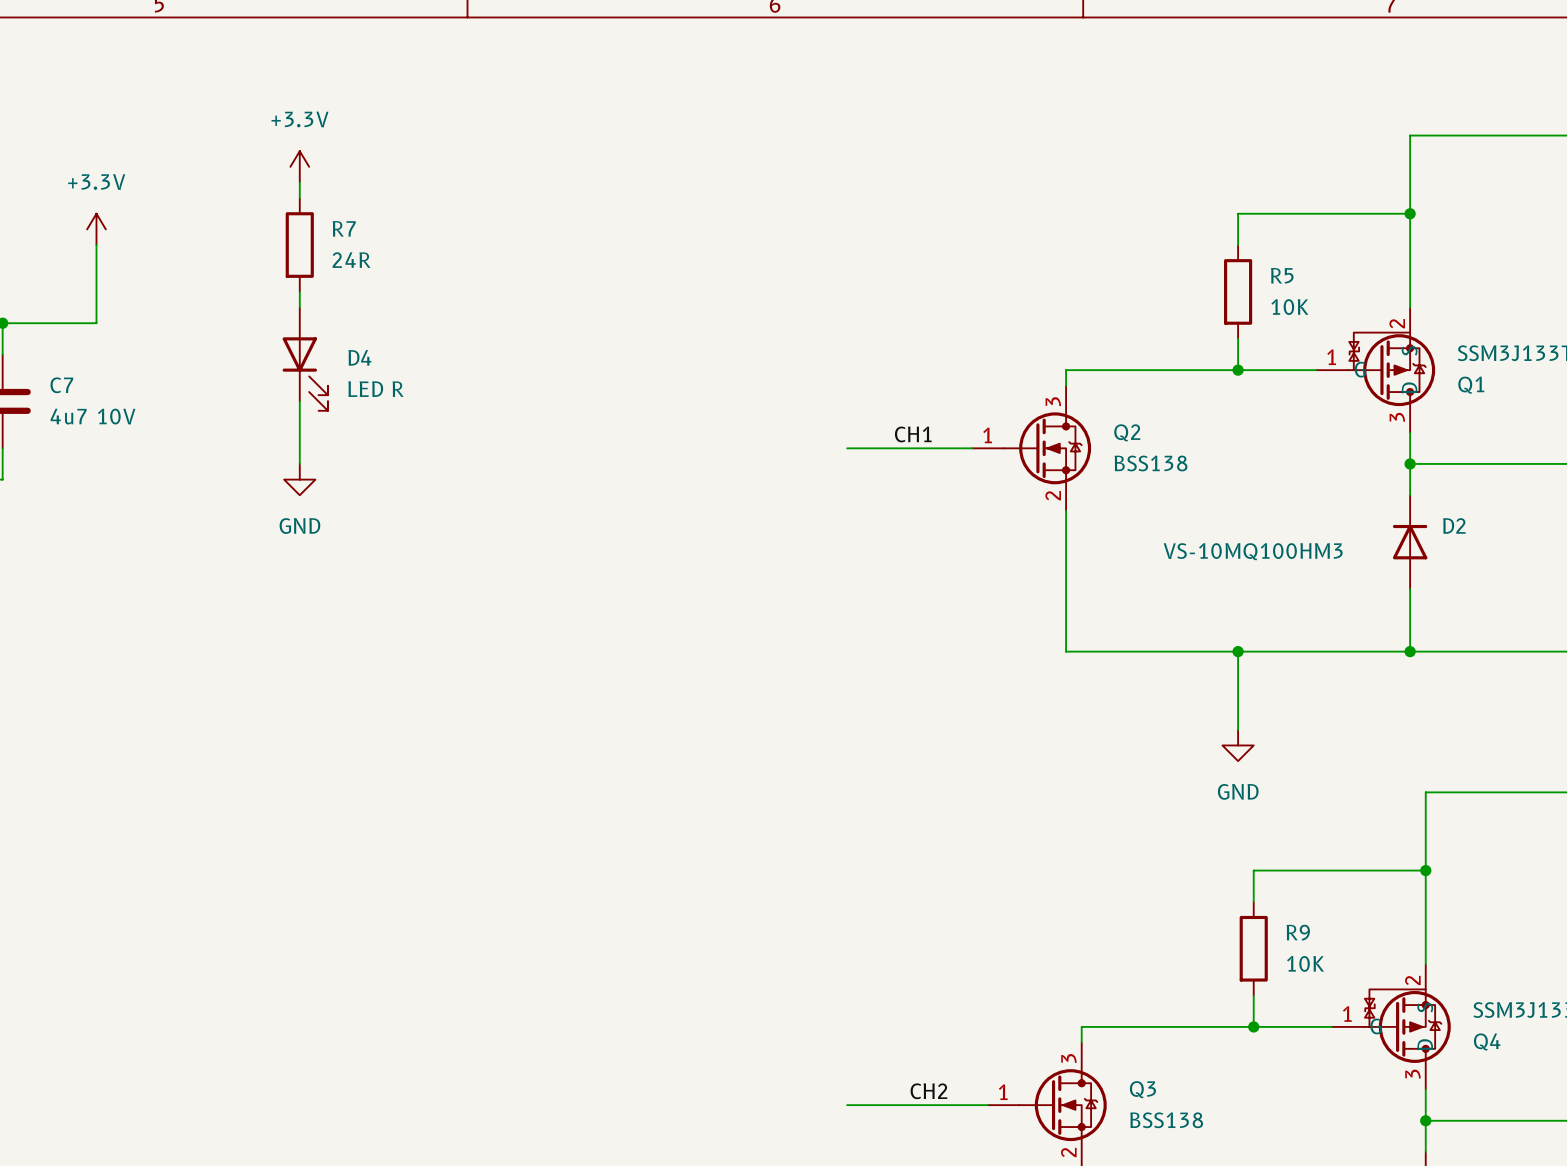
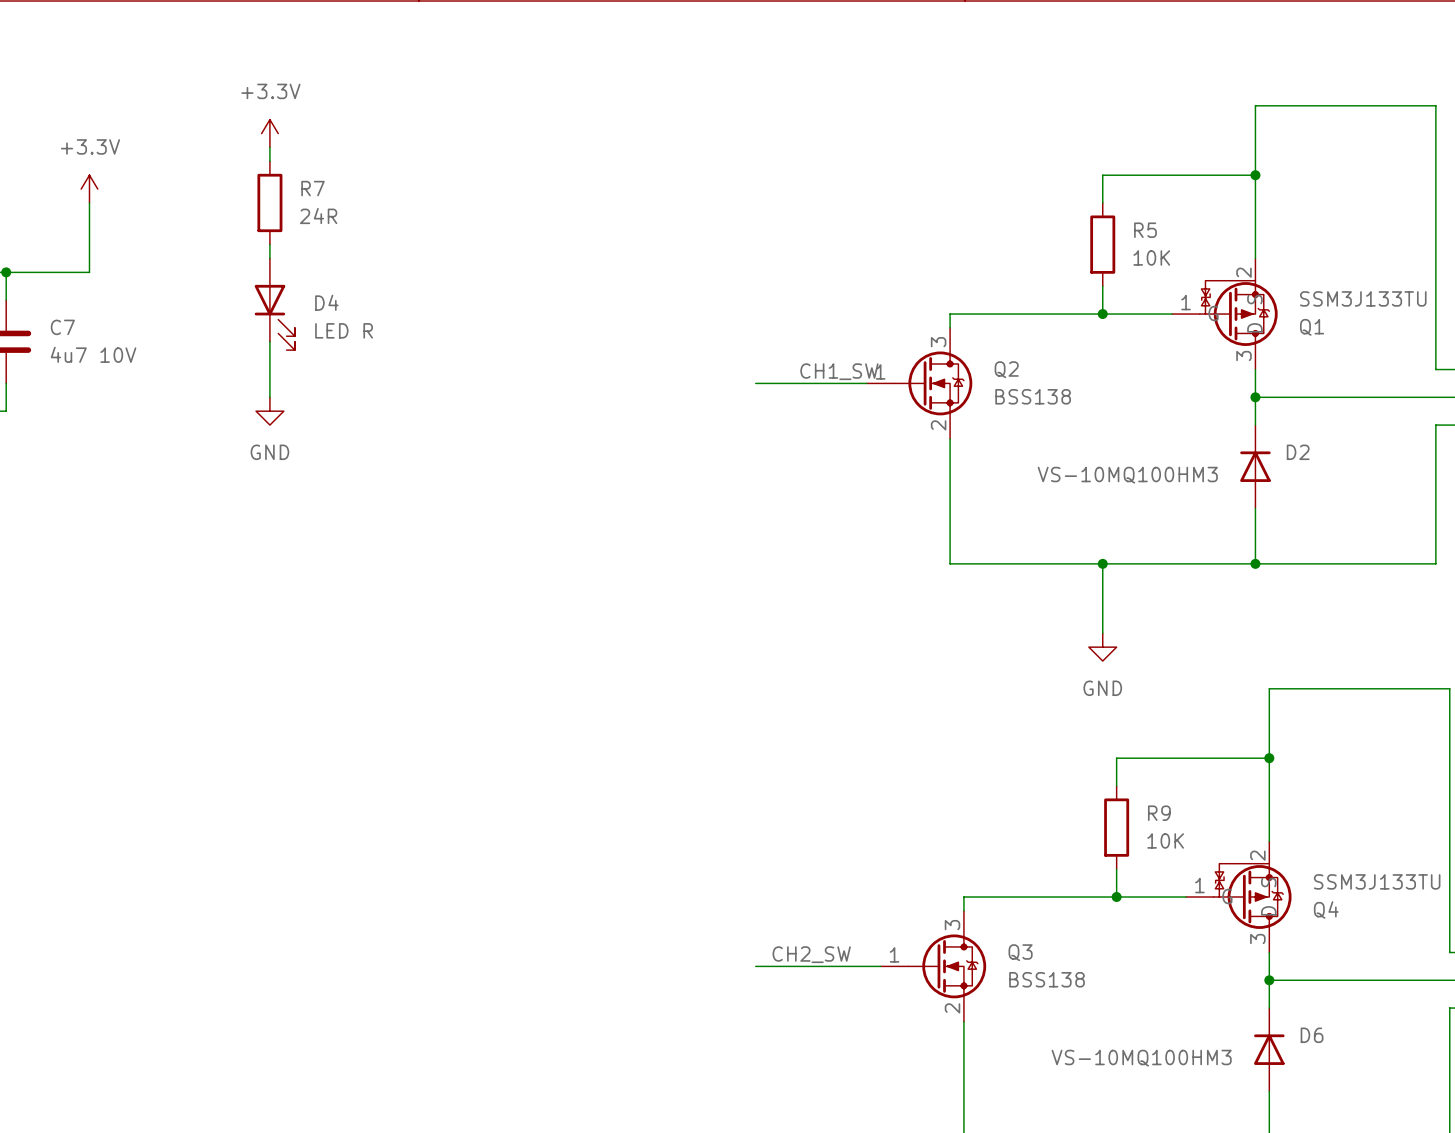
label: CH1 (913, 434) -> CH1_SW (839, 371)
label: CH2 (928, 1091) -> CH2_SW (811, 954)

